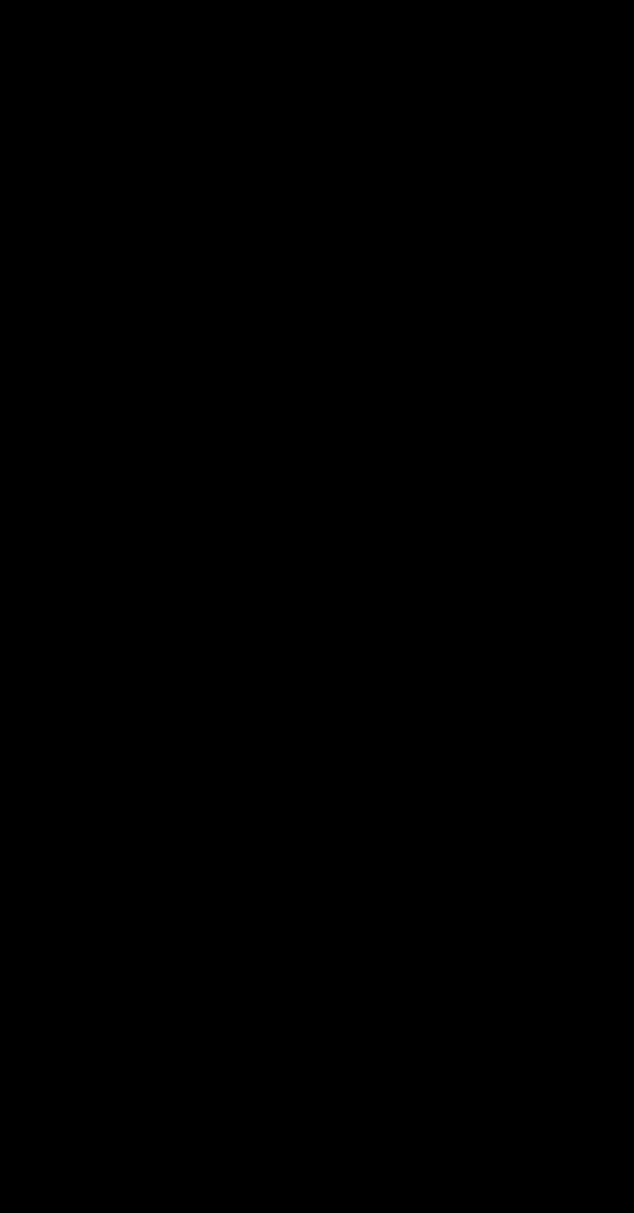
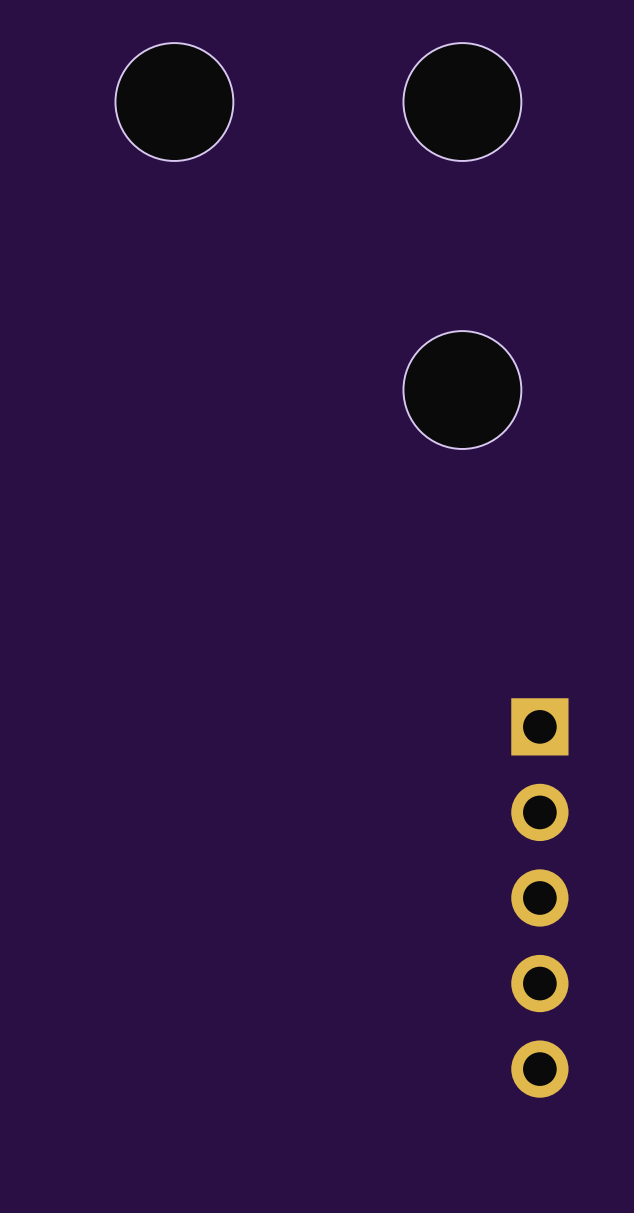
part: none -> (174, 102)
part: none -> (462, 102)
part: none -> (462, 390)
part: none -> (539, 897)

